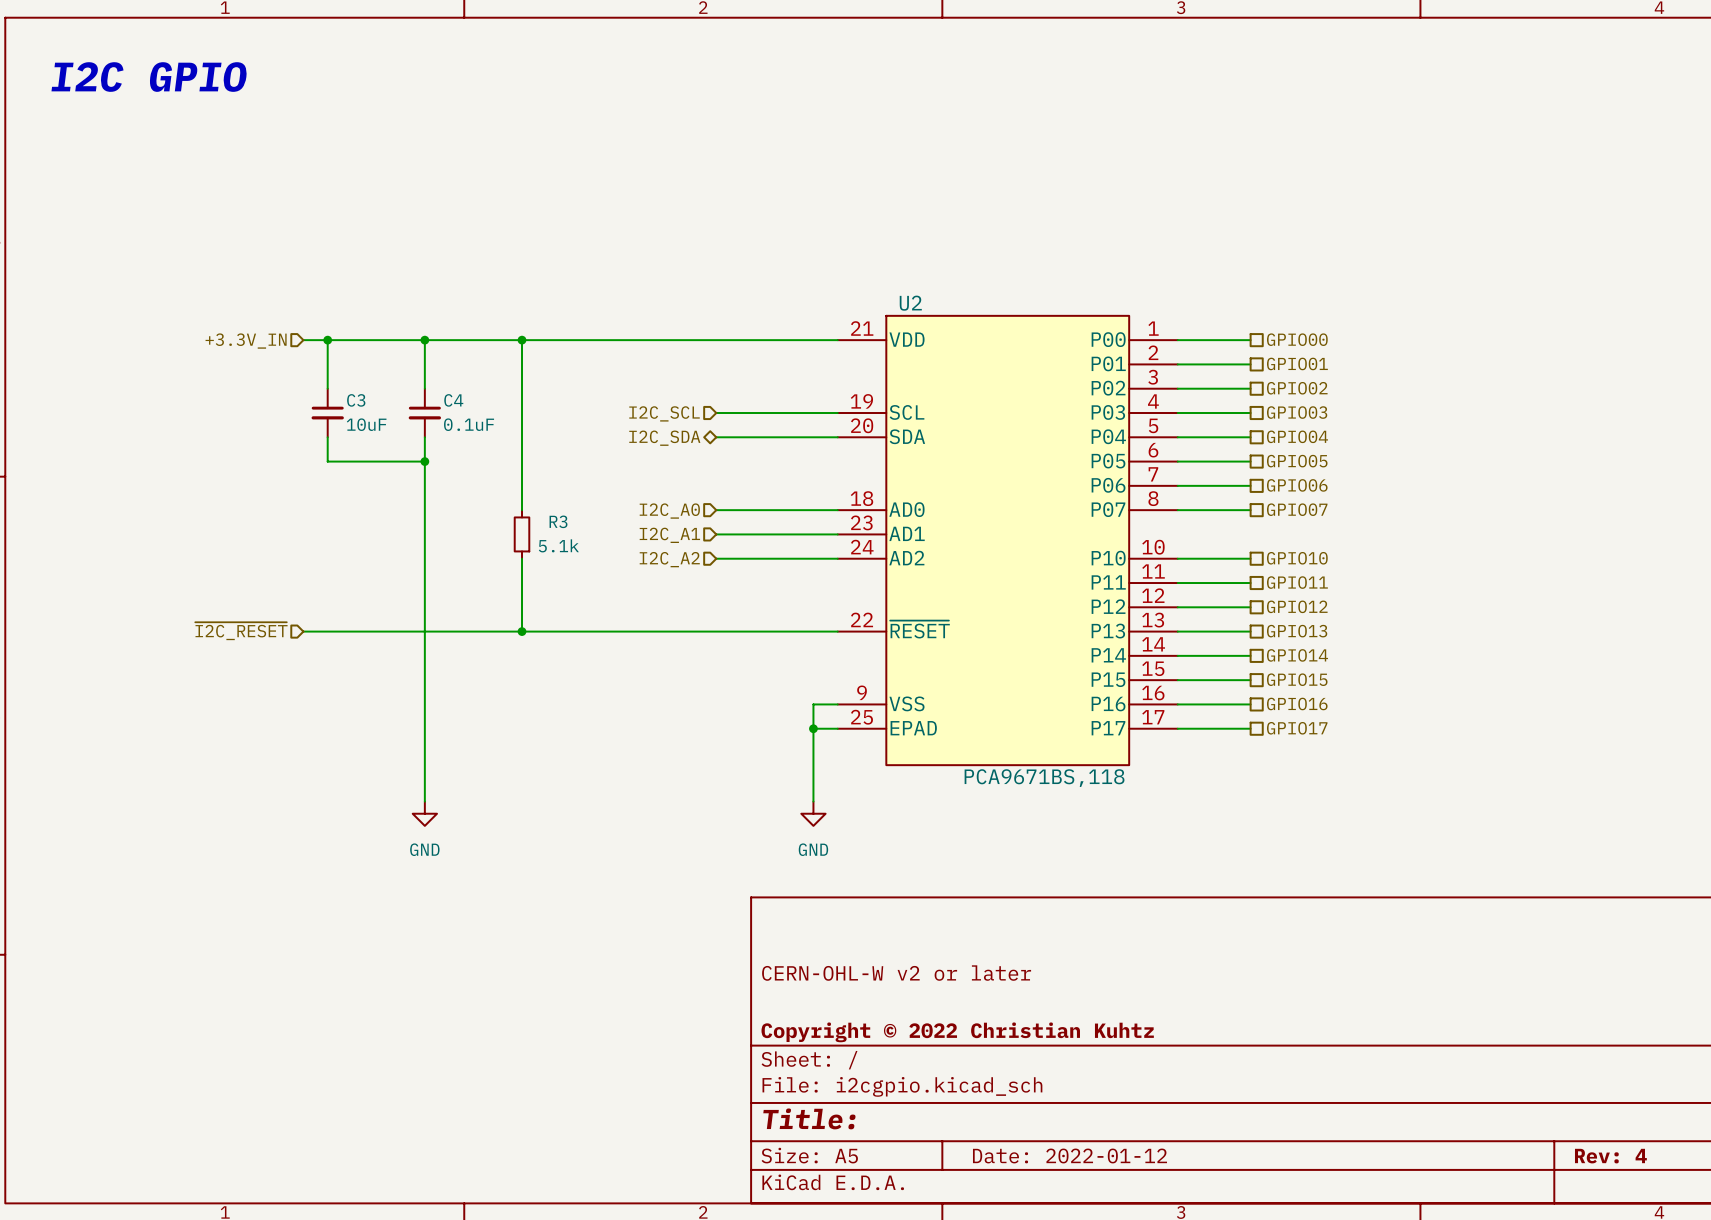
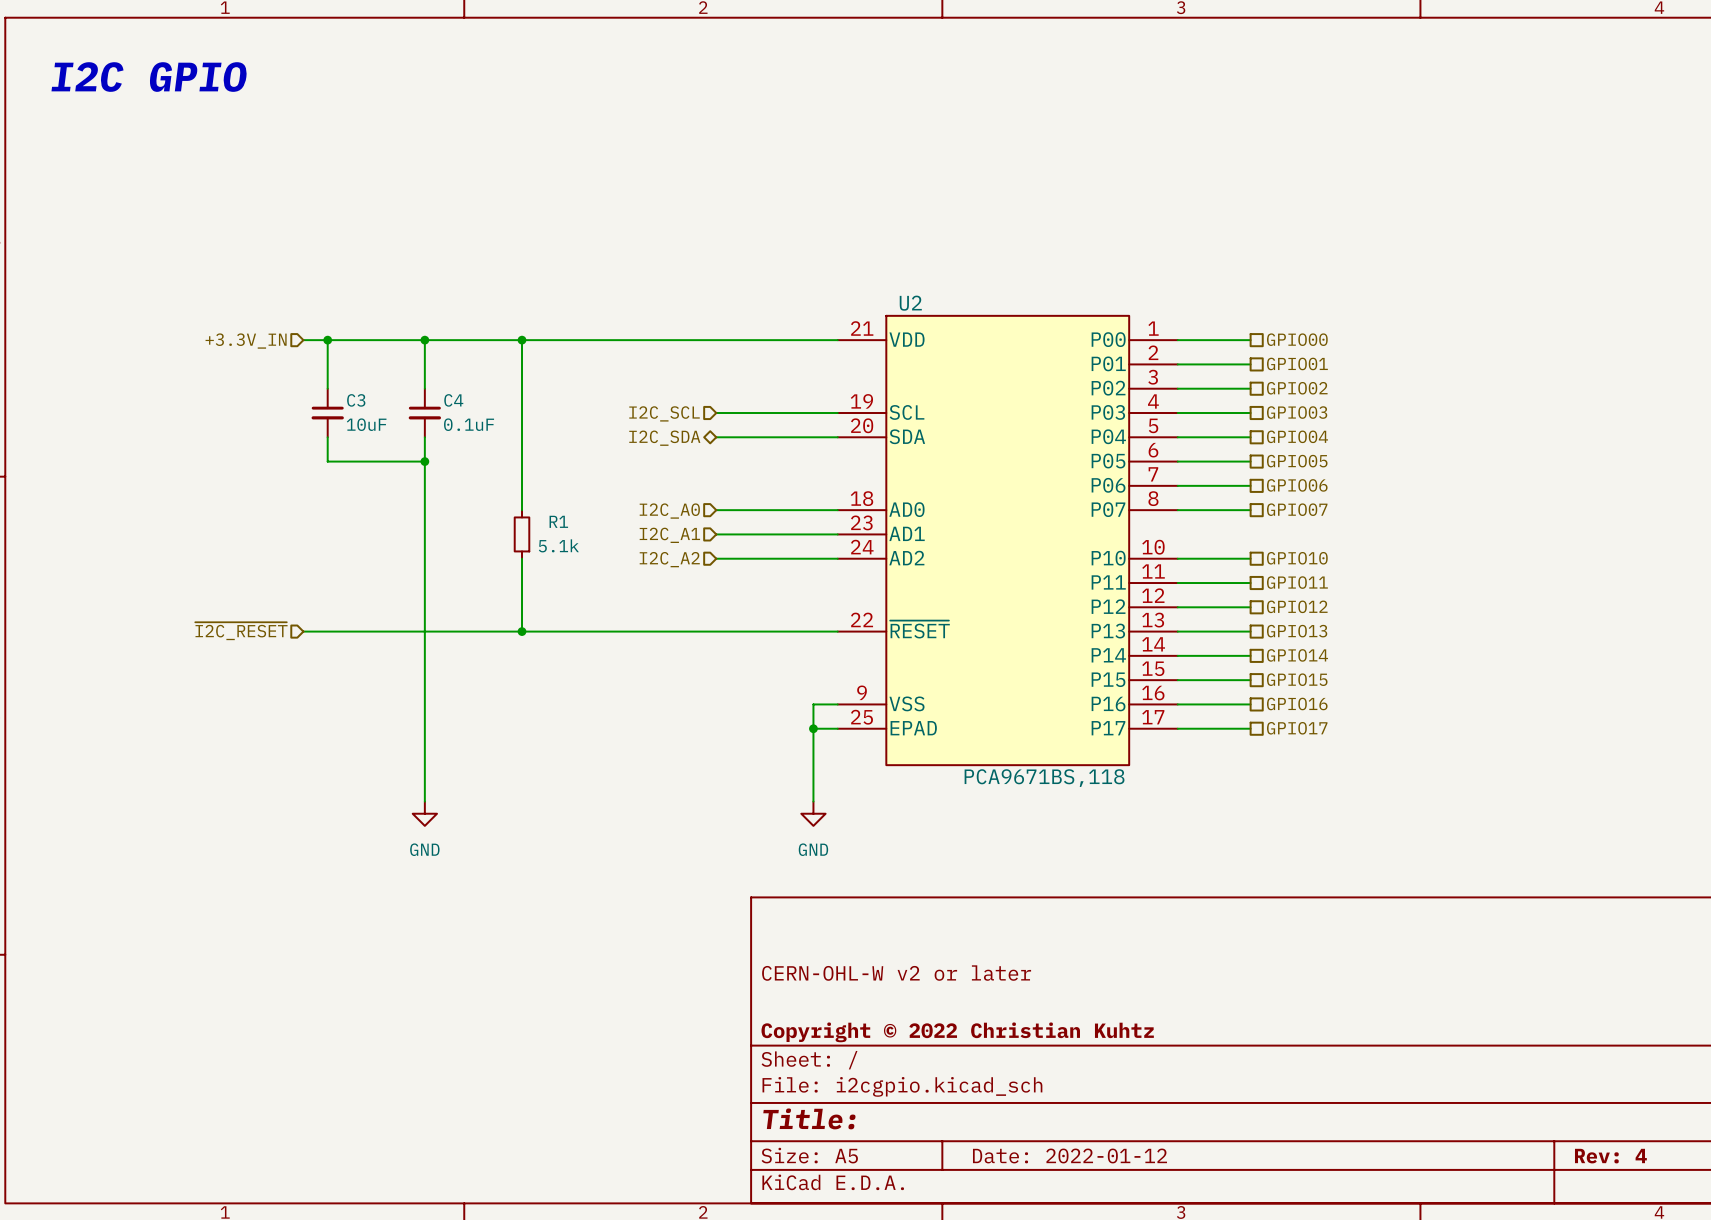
R3 name: R3 (558, 521) -> R1 (558, 521)

